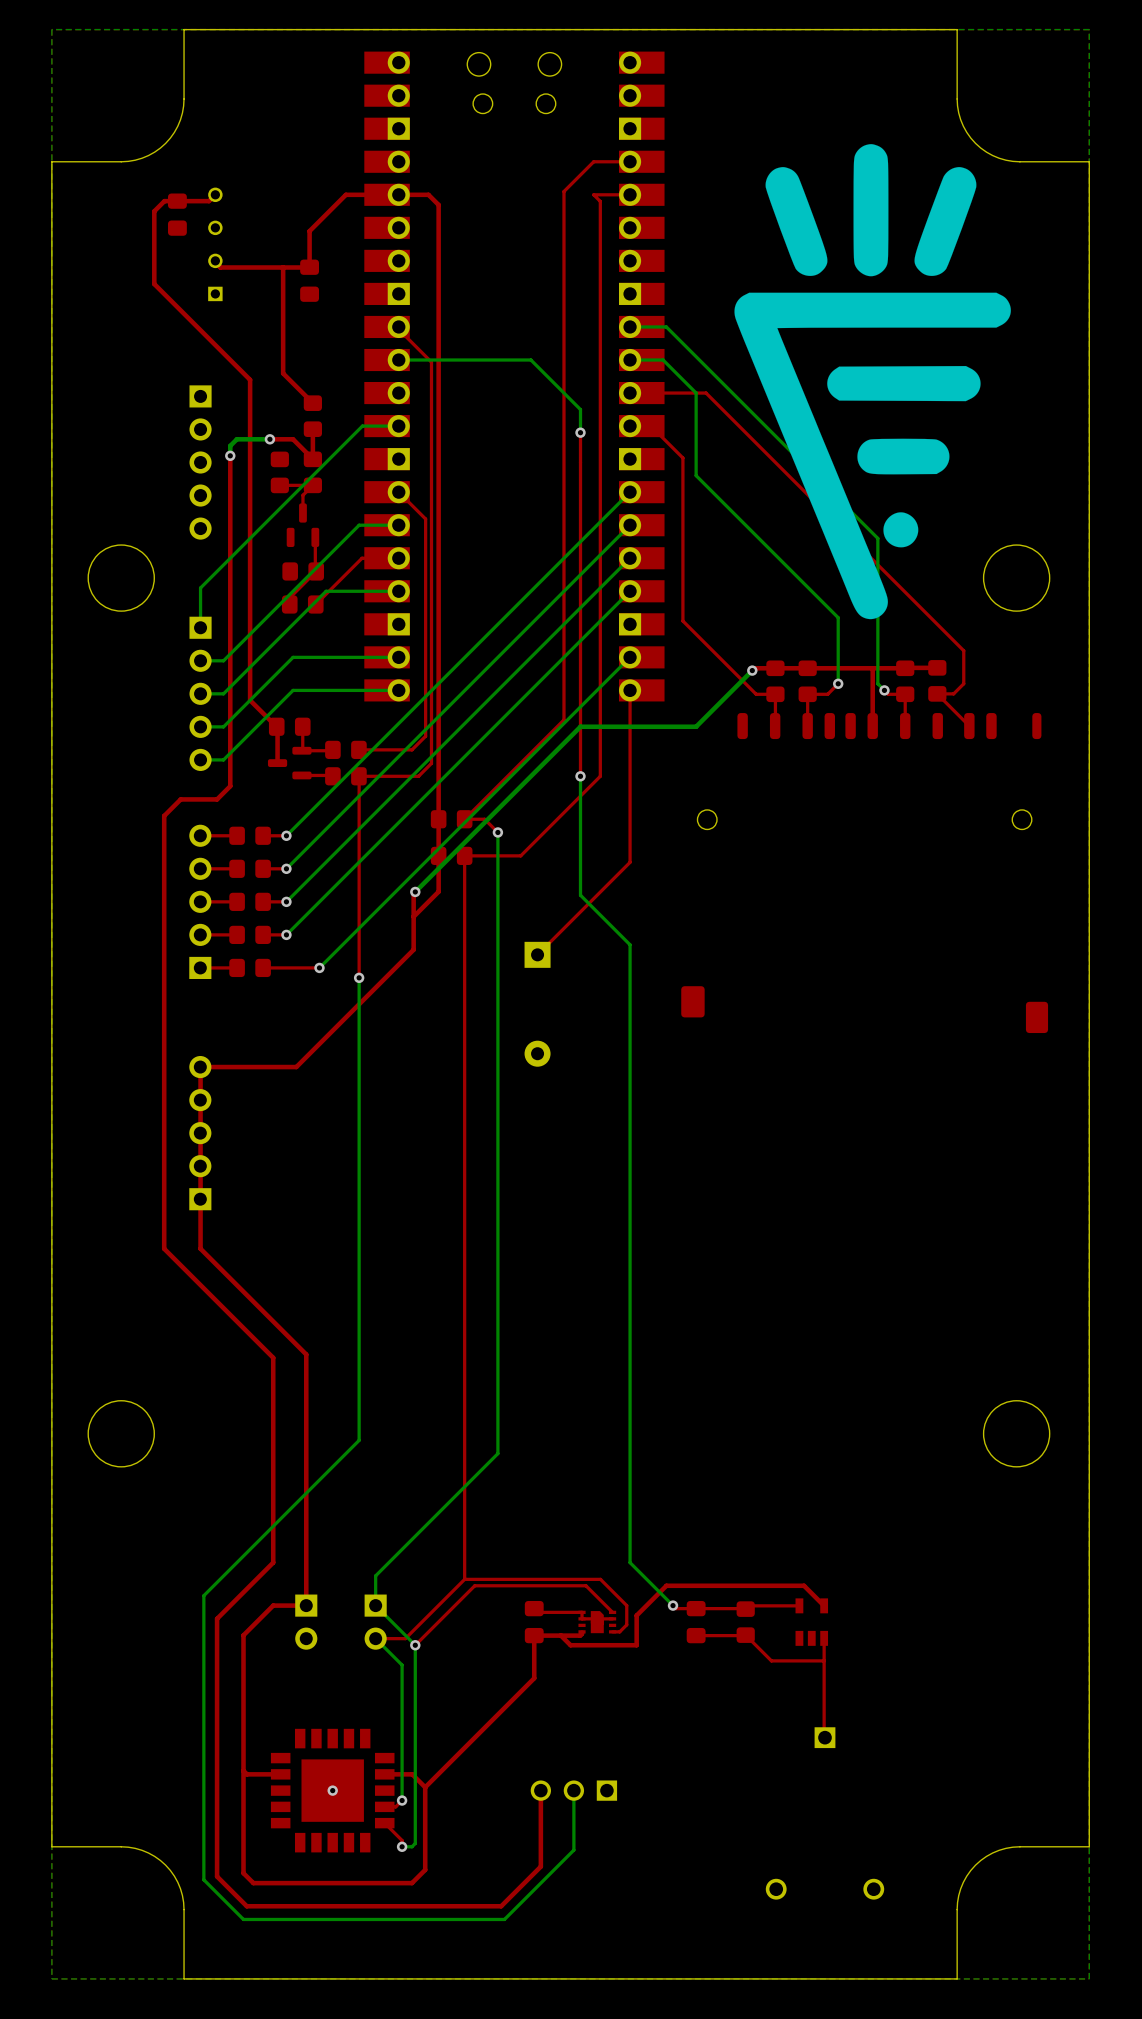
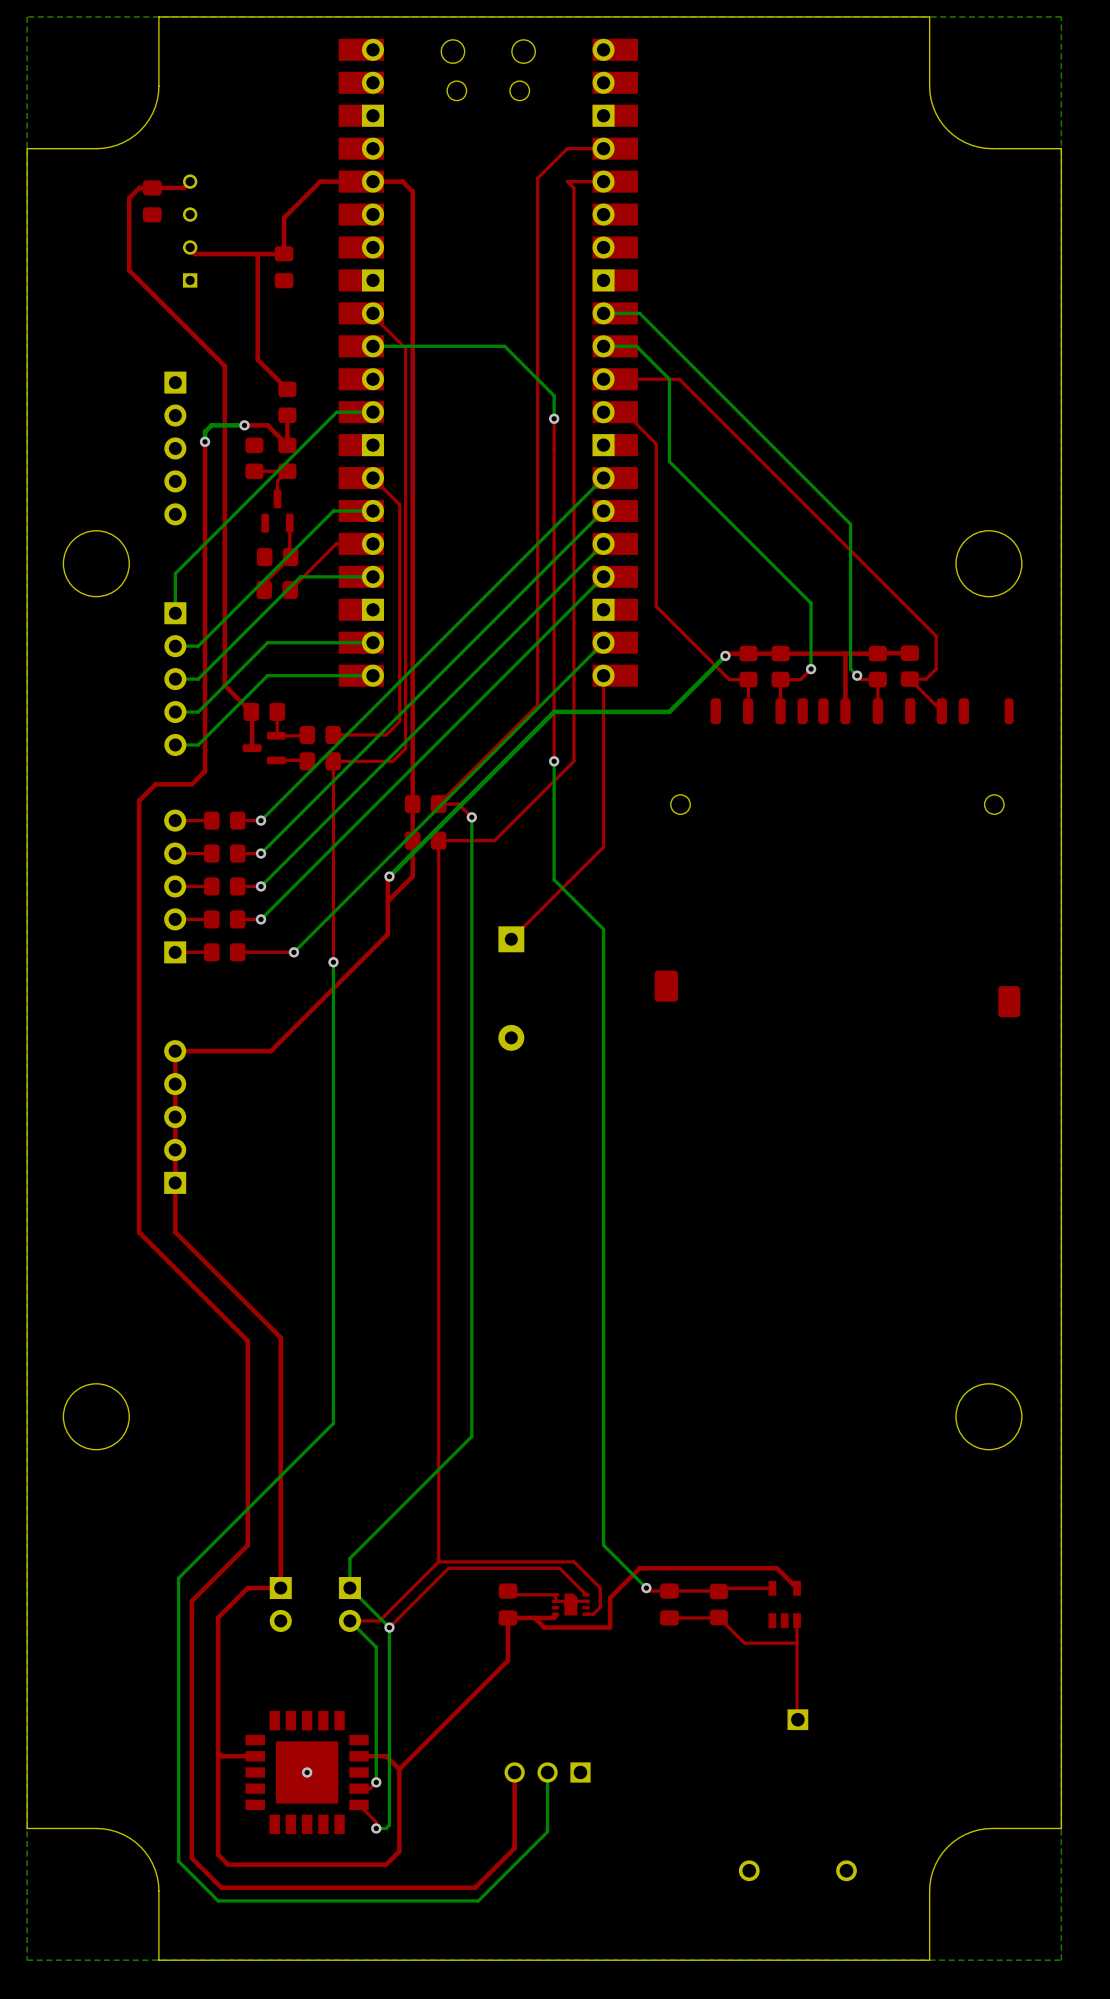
drawing: [853, 144, 889, 277] -> none
drawing: [765, 167, 828, 276] -> none
drawing: [914, 167, 977, 276] -> none
drawing: [734, 292, 1011, 620] -> none

